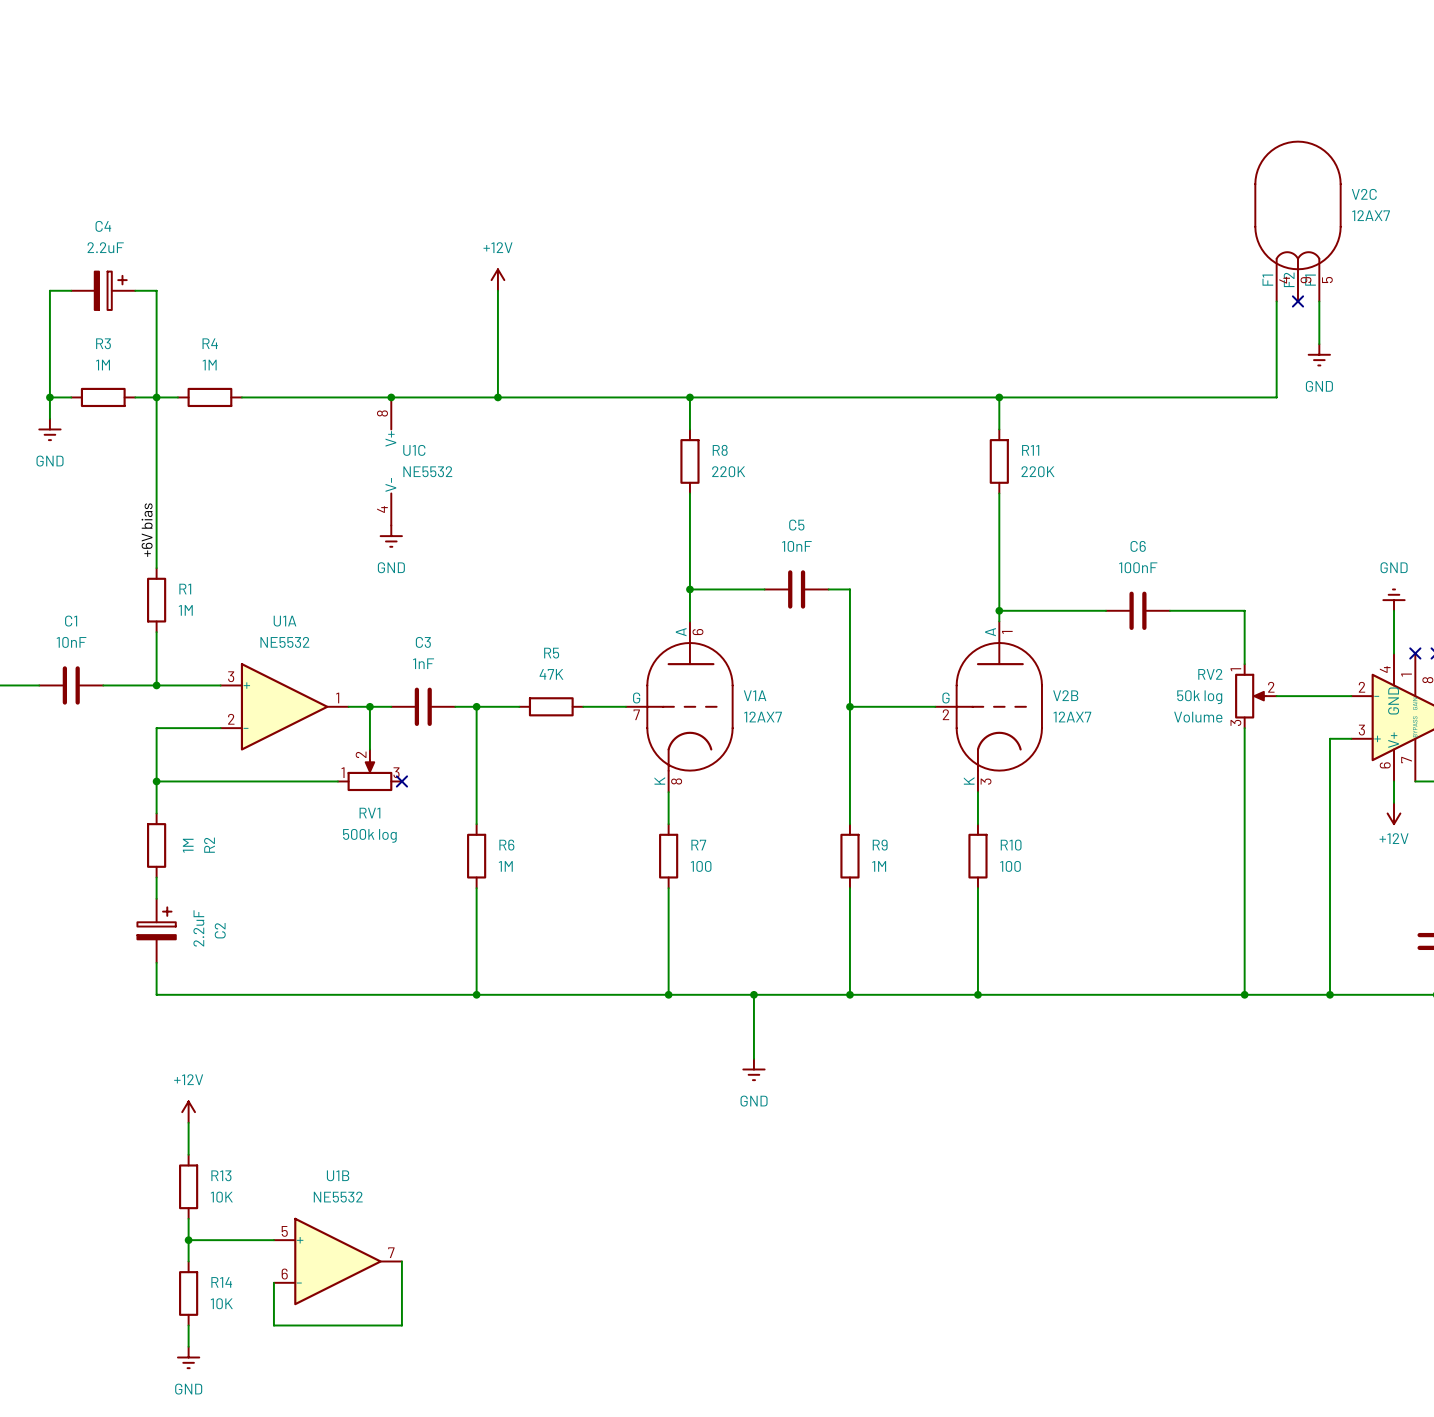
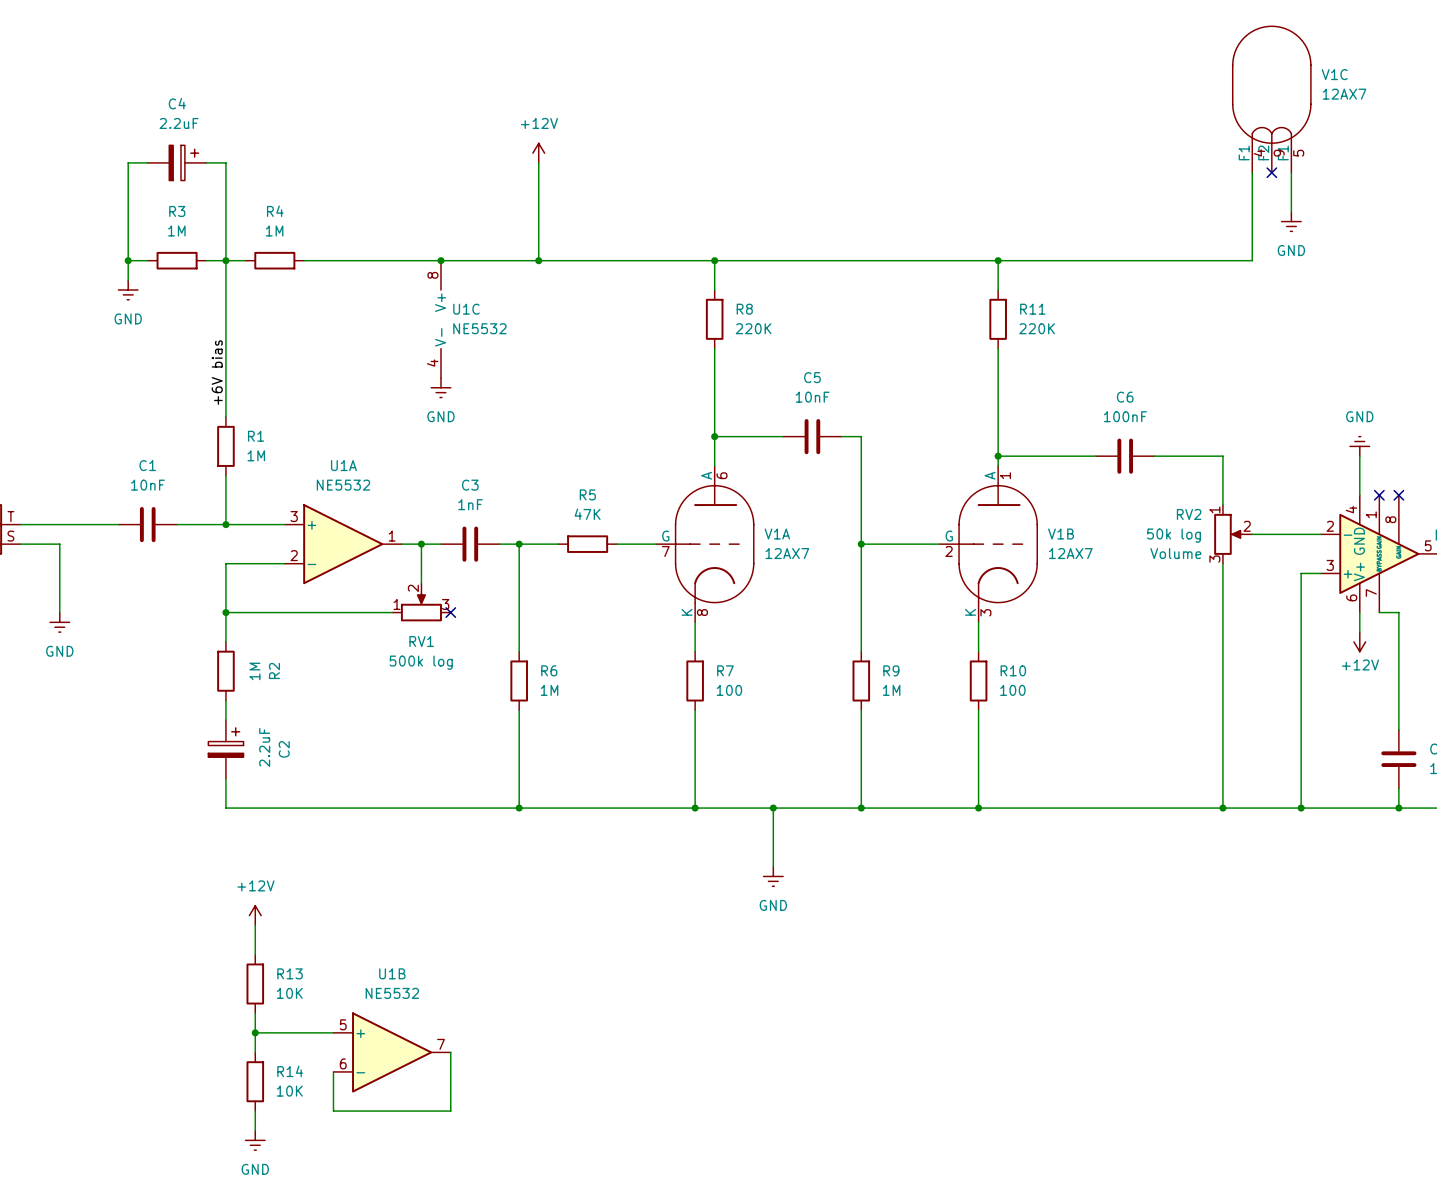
V2C name: V2C (1364, 194) -> V1C (1334, 74)
V2B name: V2B (1065, 695) -> V1B (1061, 534)

